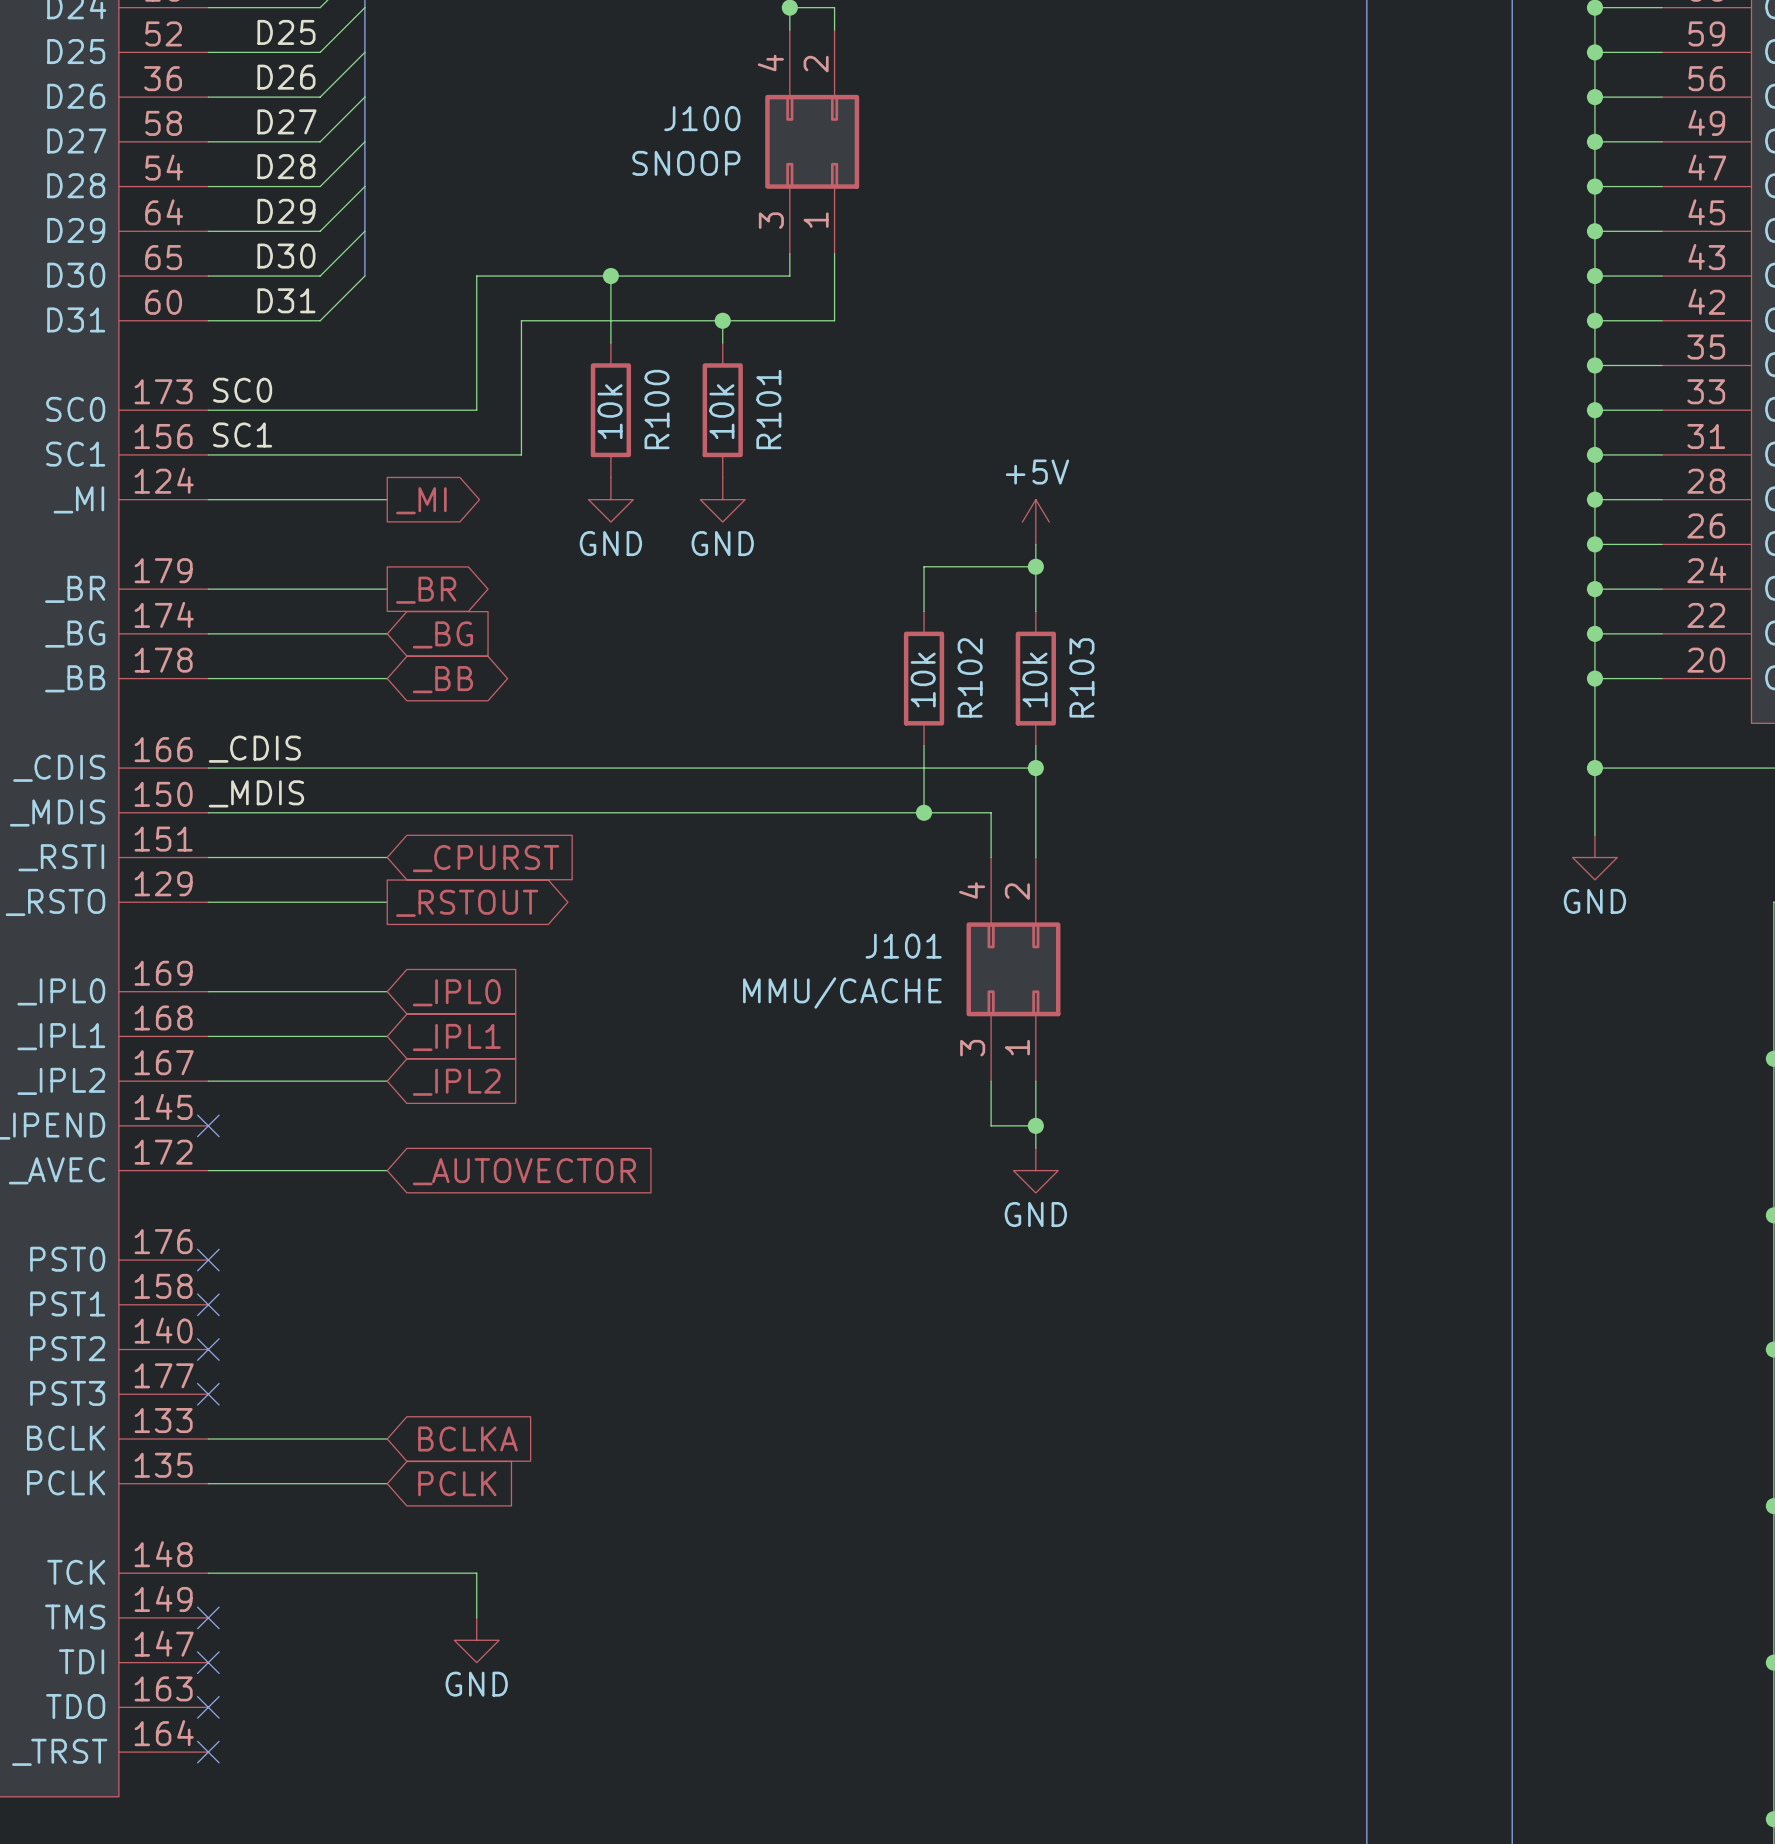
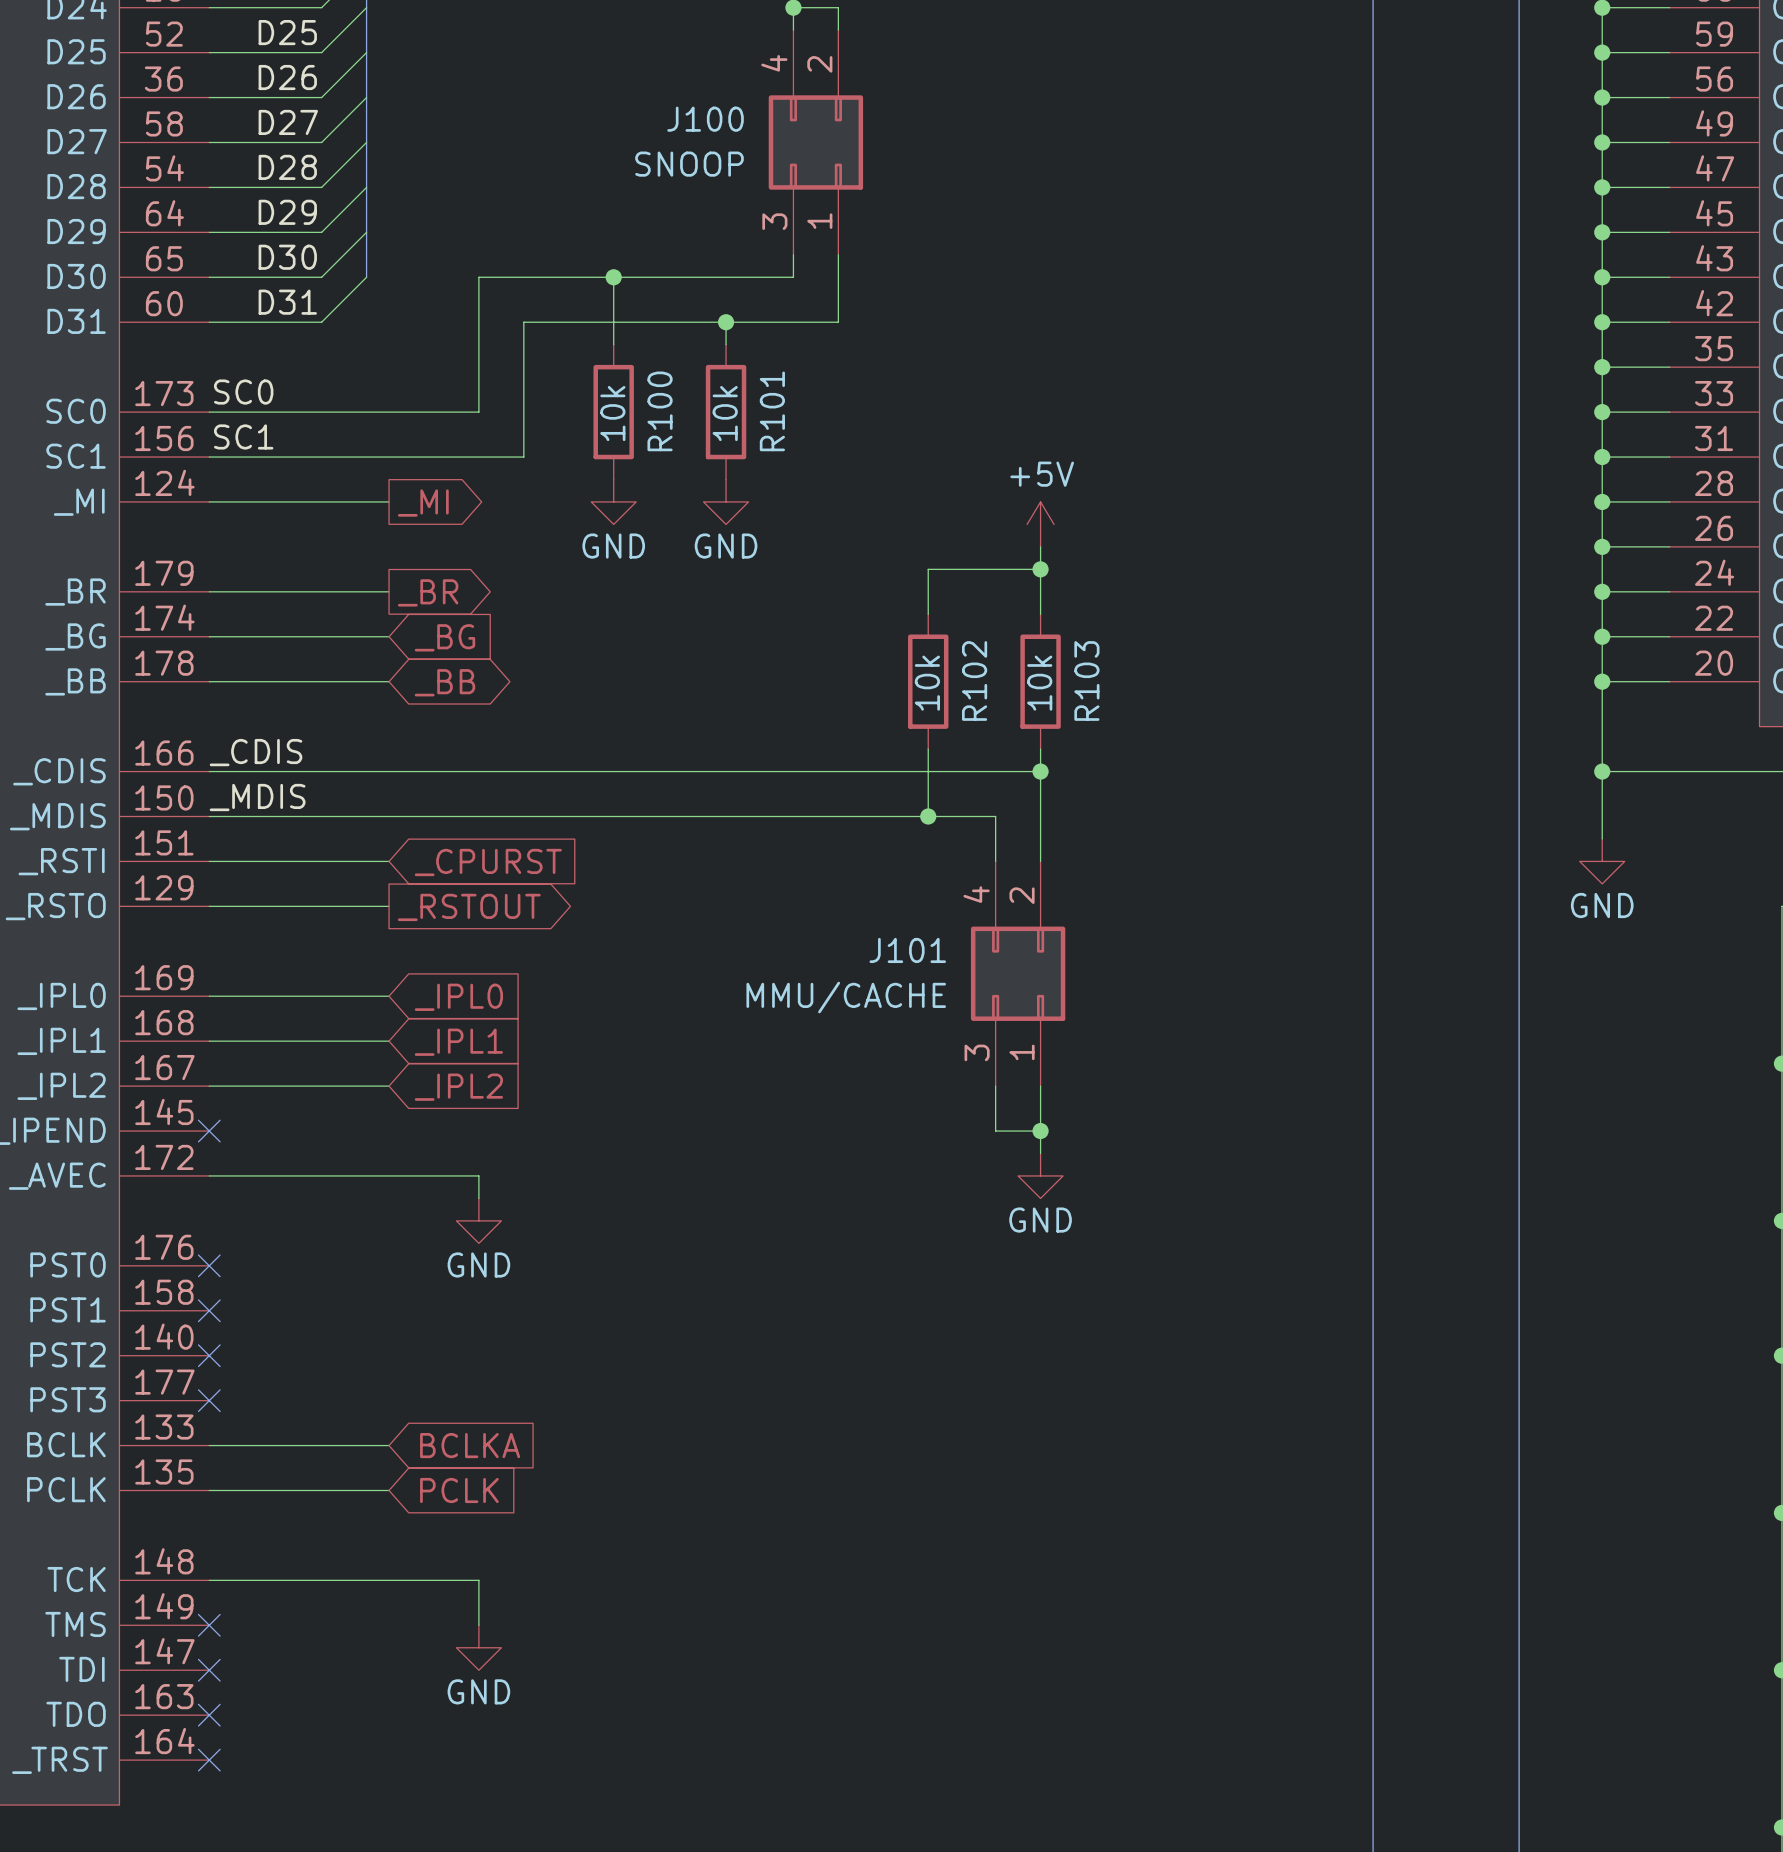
wire: none -> (389, 1175) (478, 1175) (478, 1198)
global label: _AUTOVECTOR (524, 1171) -> none
power symbol: none -> GND (478, 1220)

